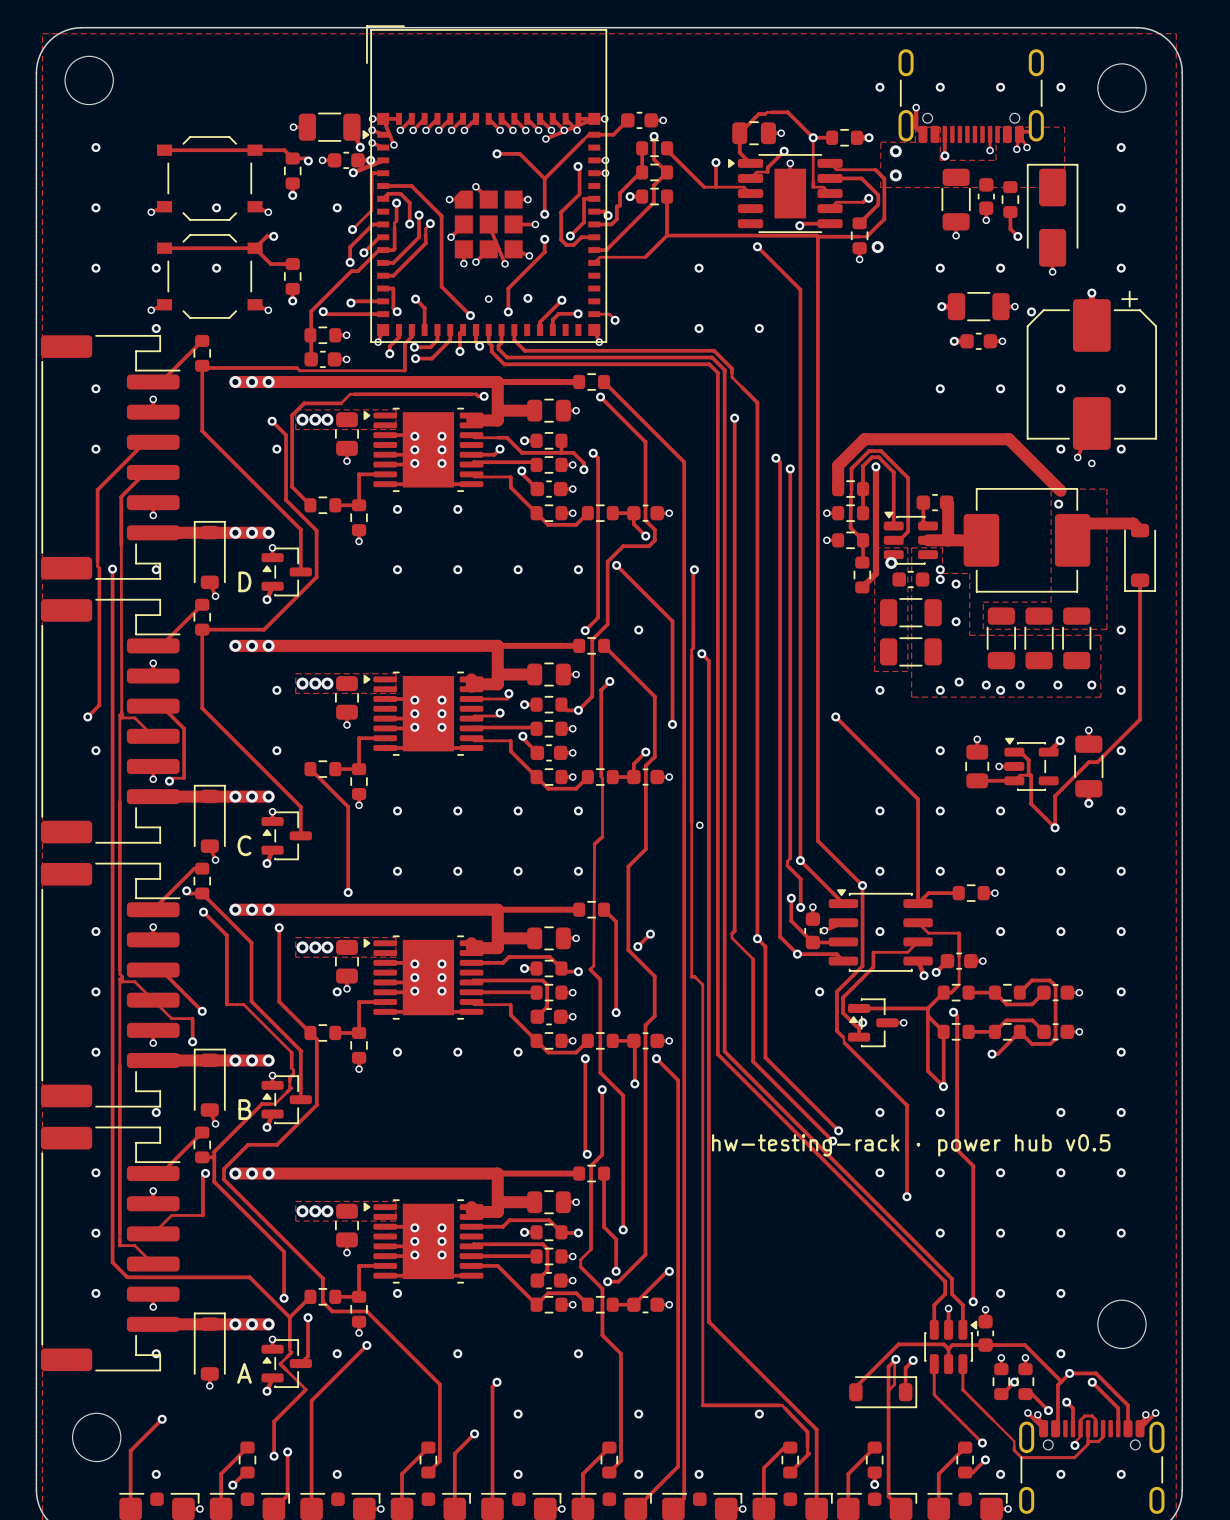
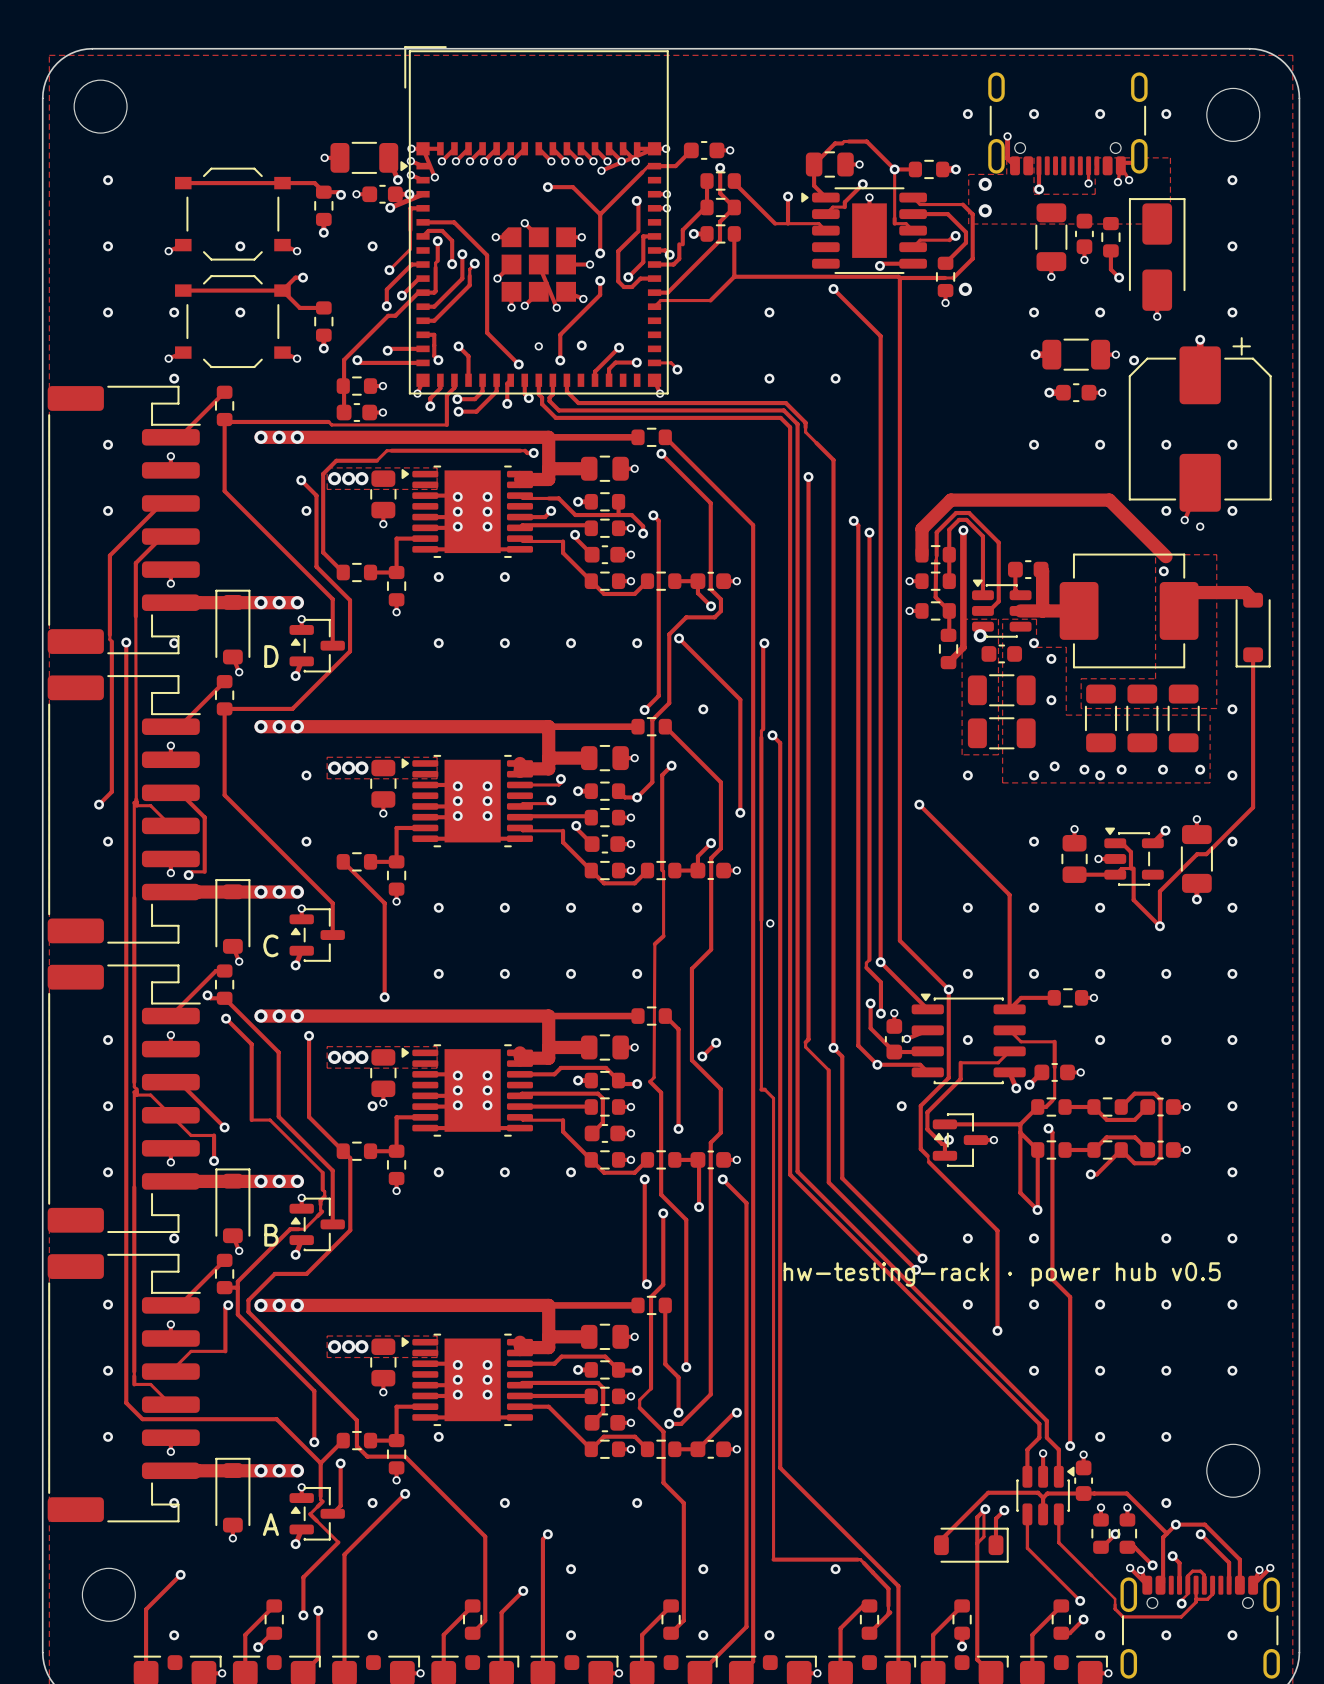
via: (940, 579) -> none

